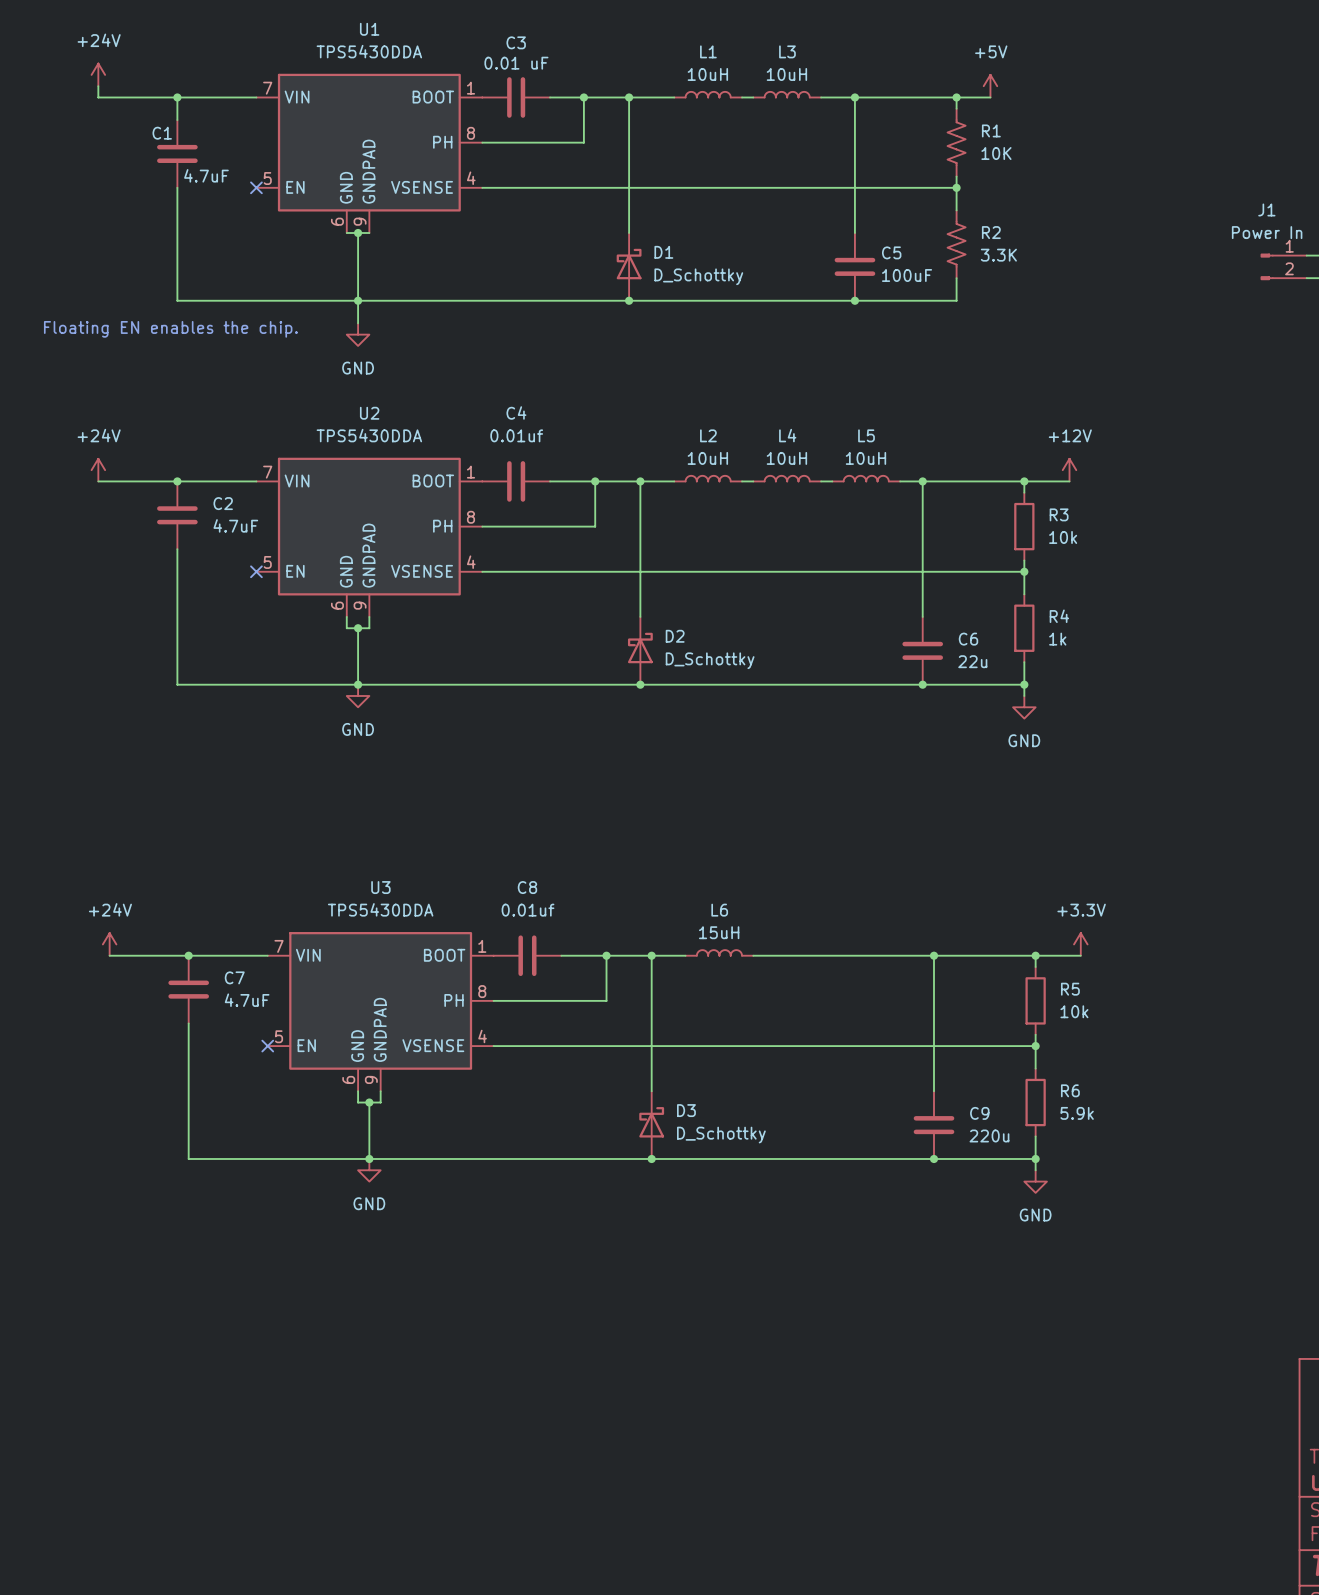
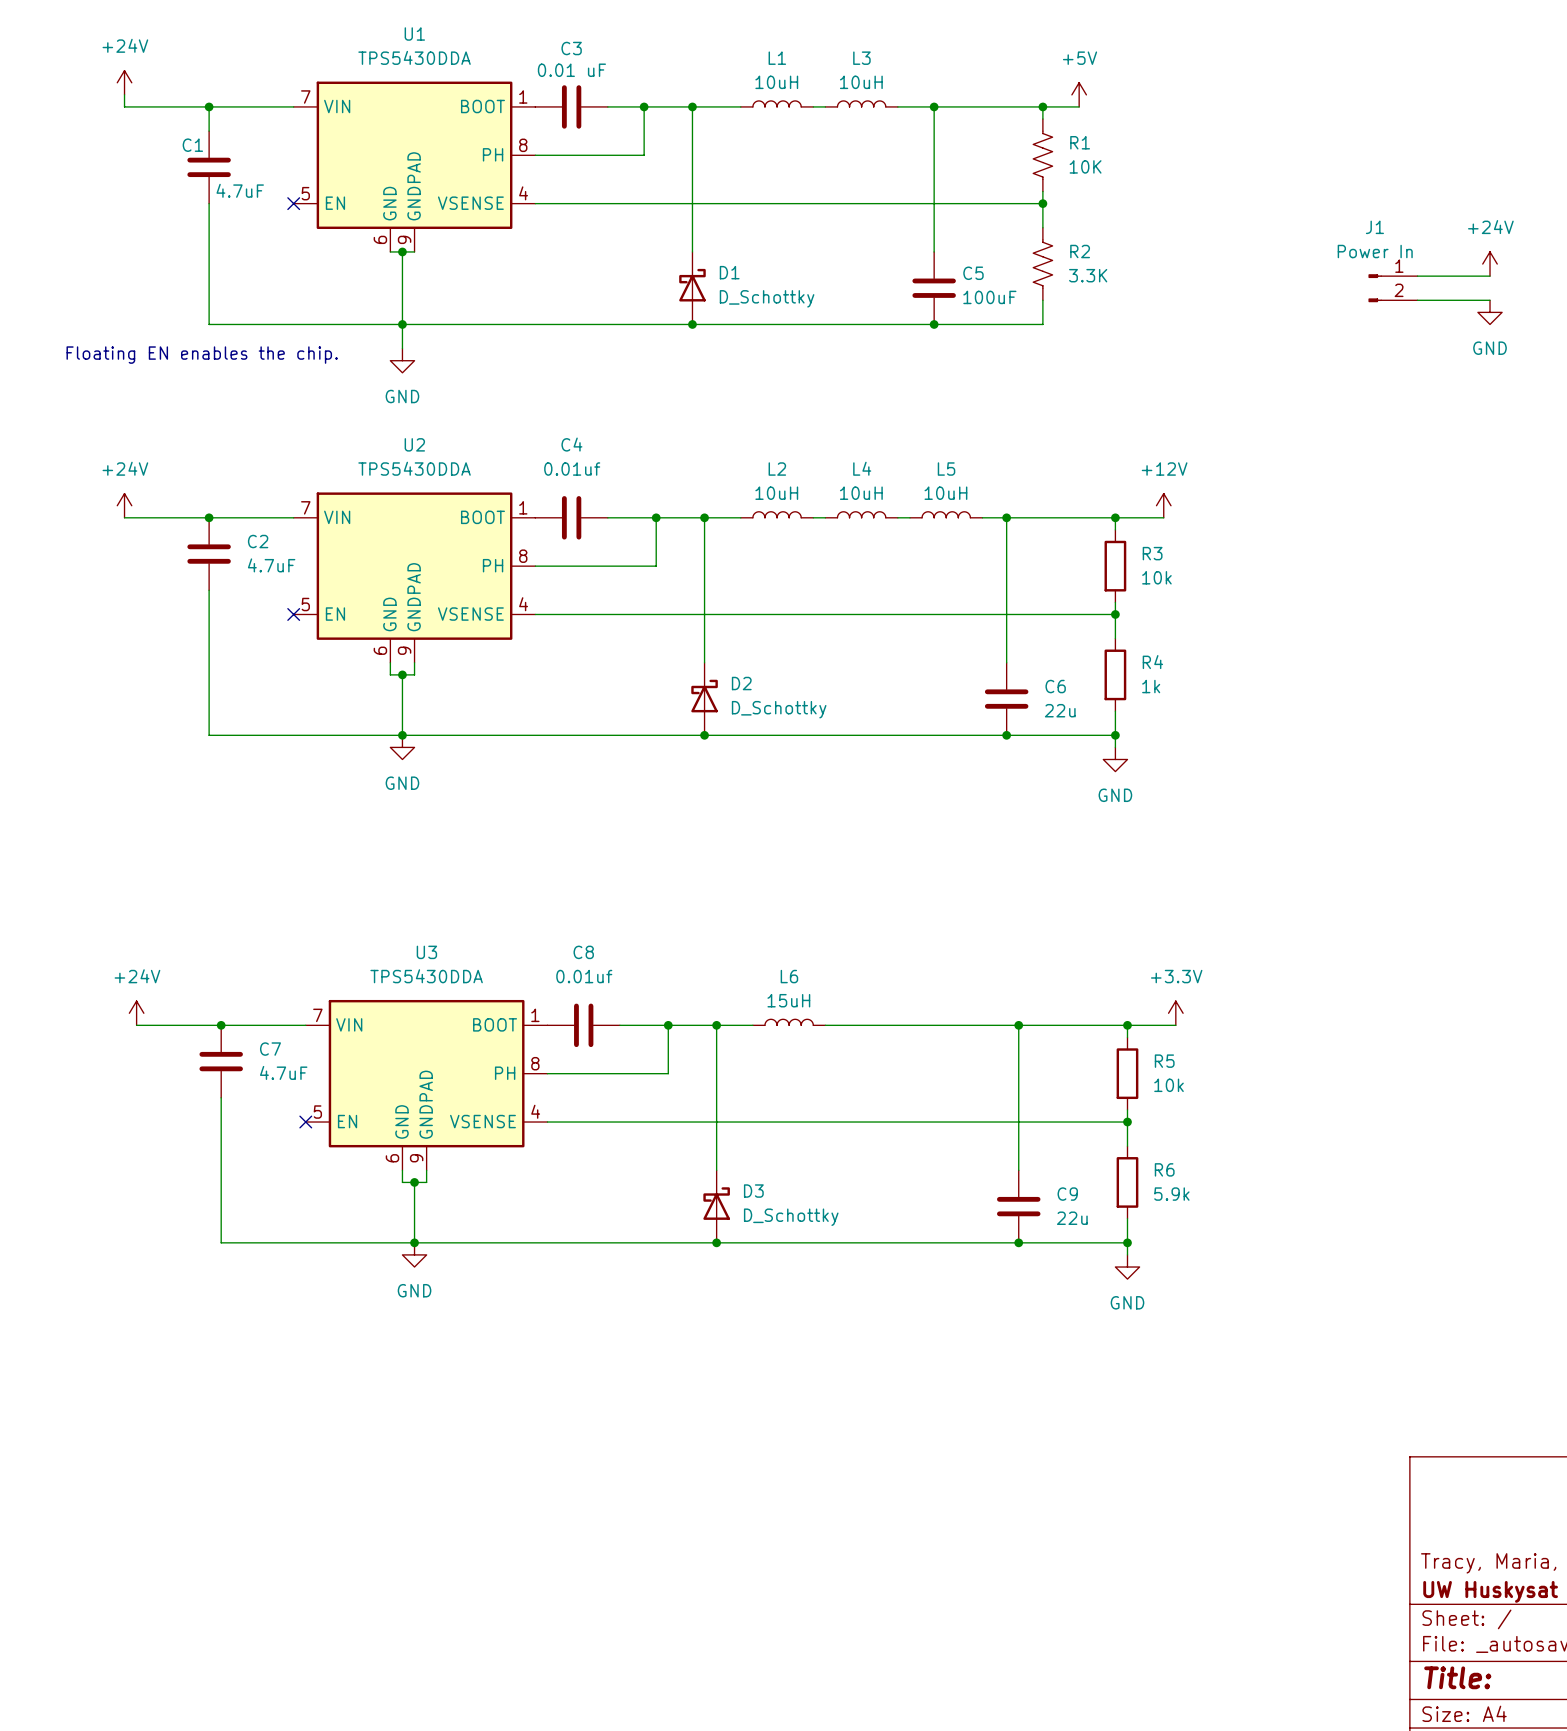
C9 value: 220u (989, 1135) -> 22u (1072, 1218)

